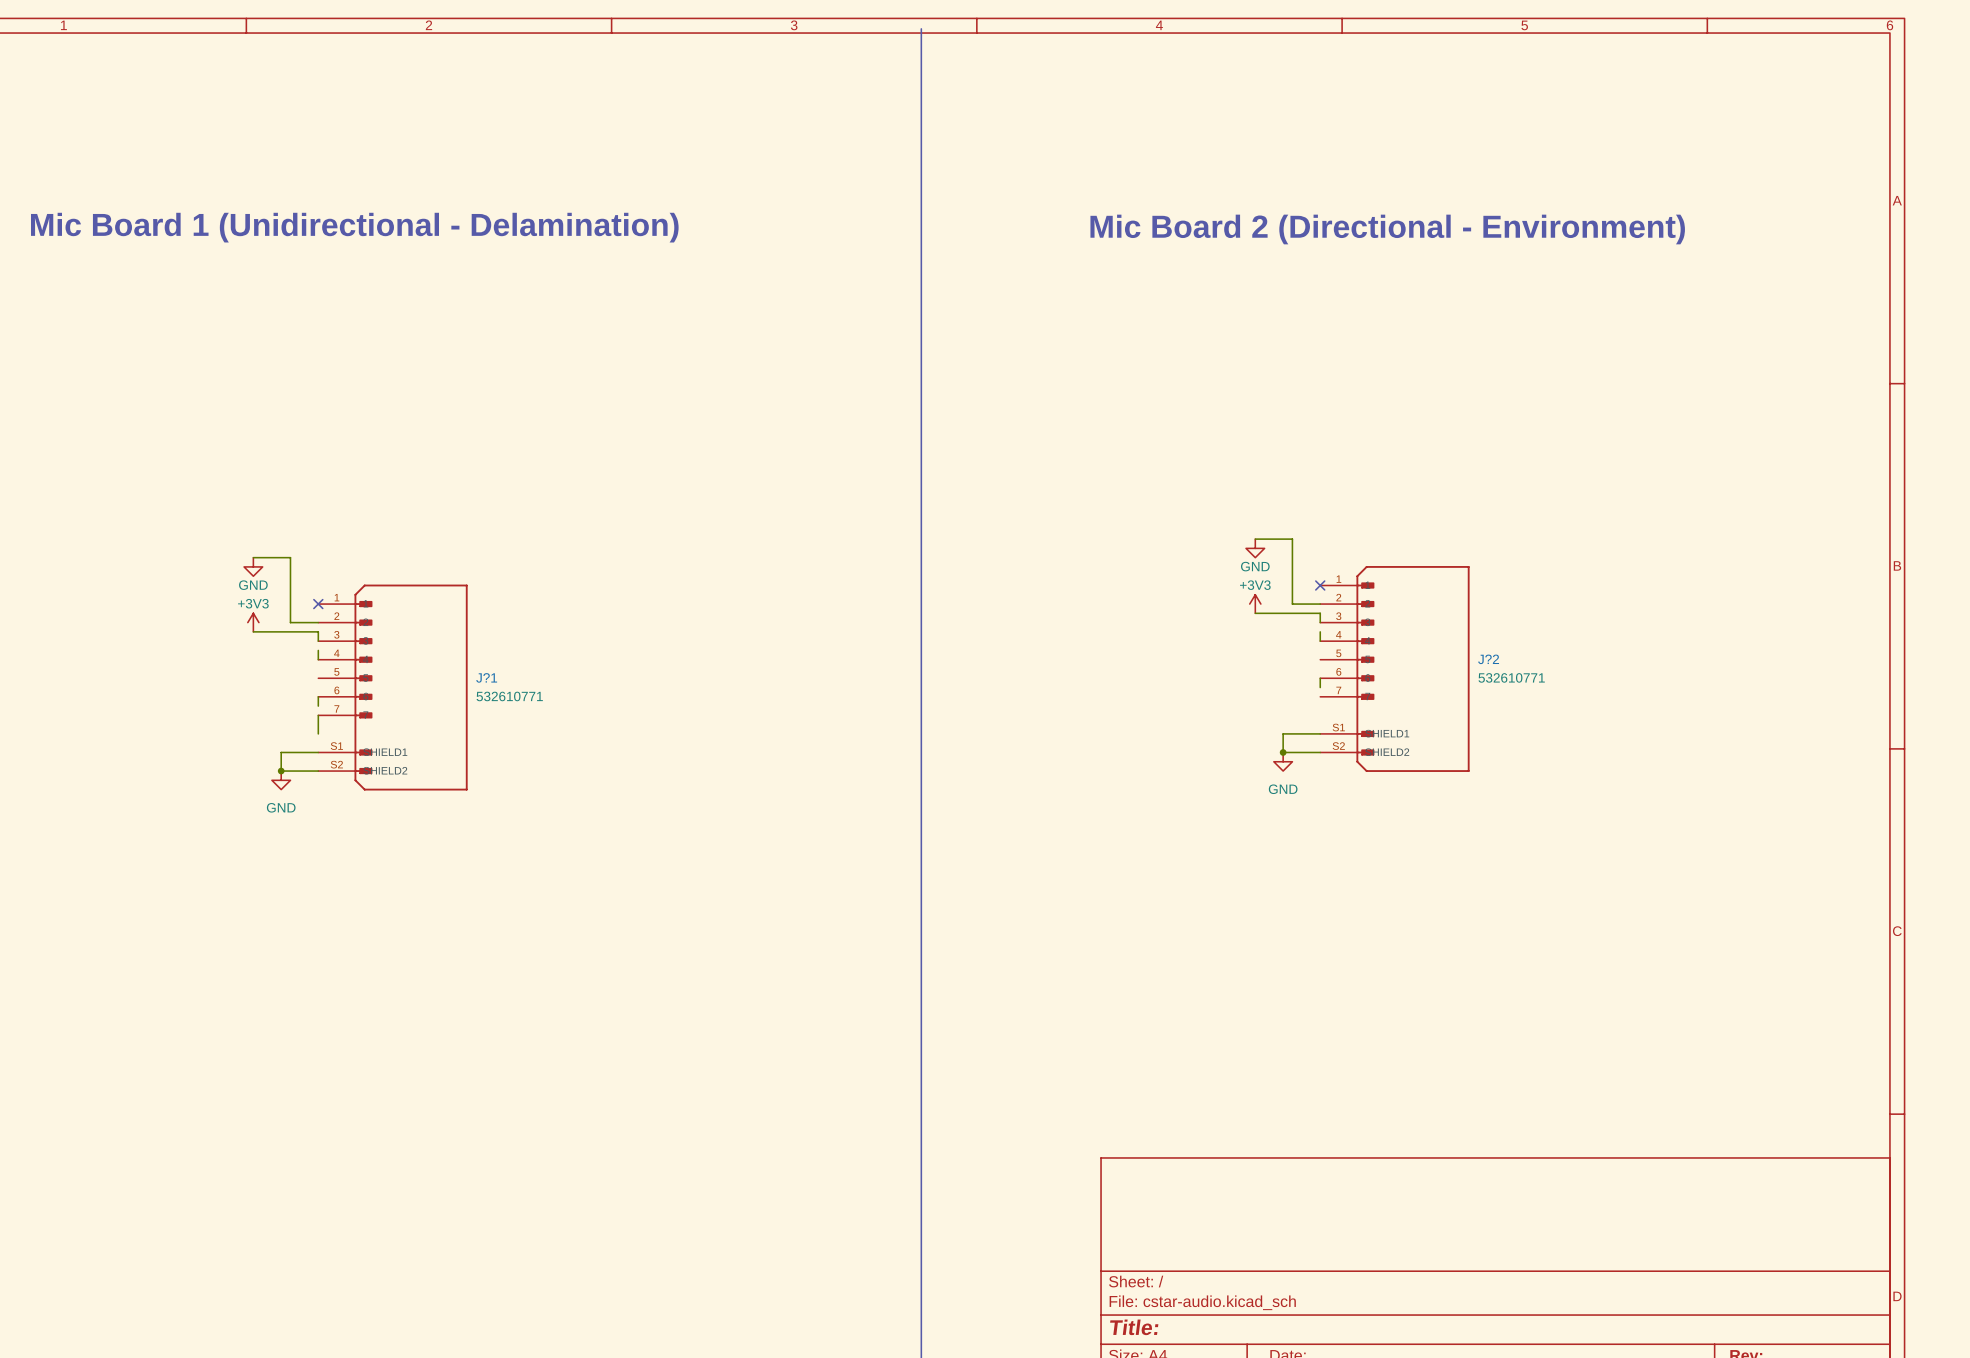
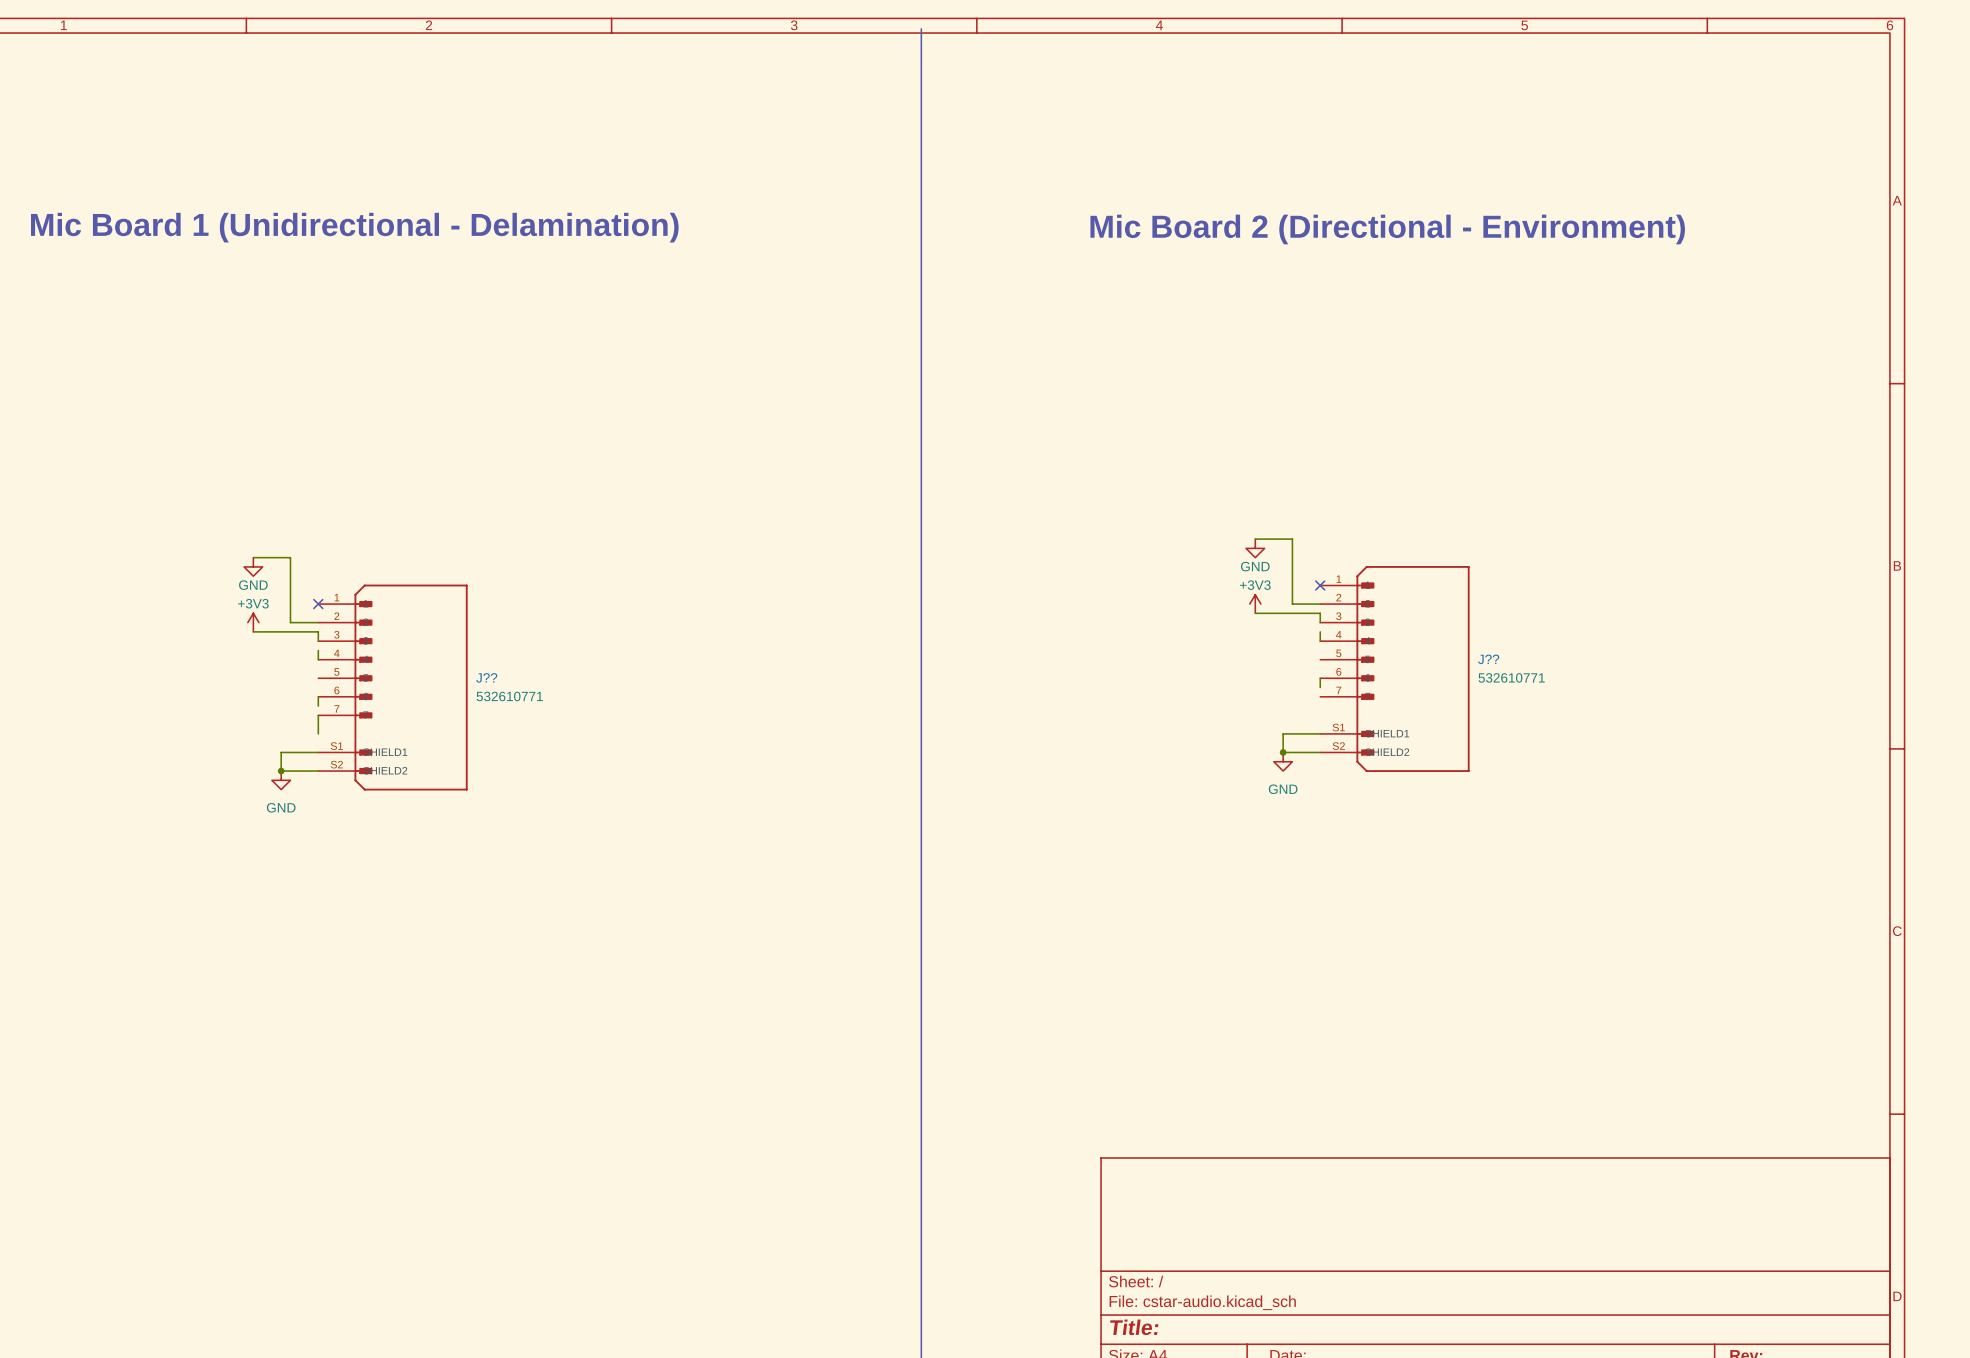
J?2 name: J?2 (1488, 659) -> J?? (1488, 659)
J?1 name: J?1 (486, 677) -> J?? (486, 677)

